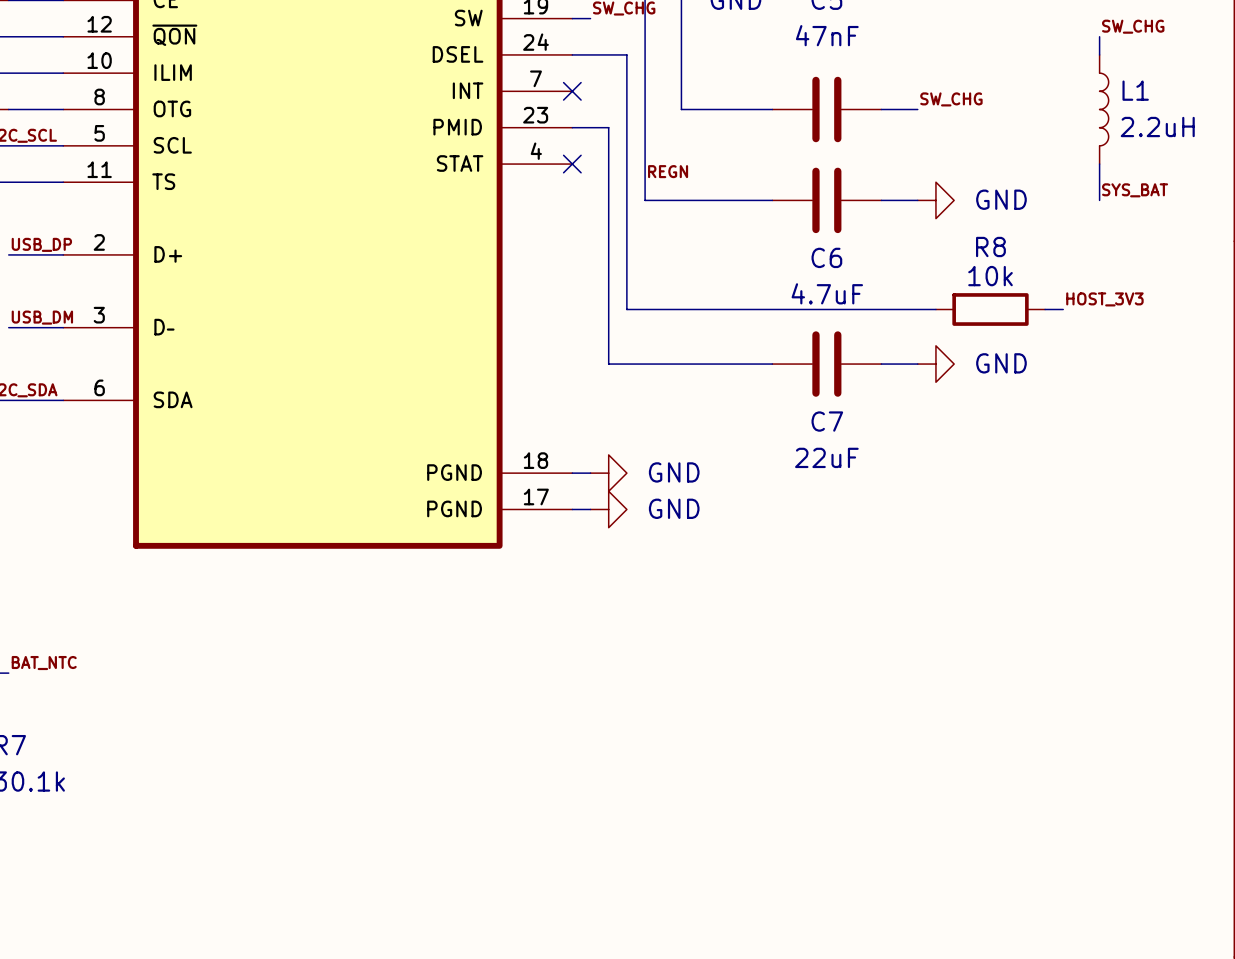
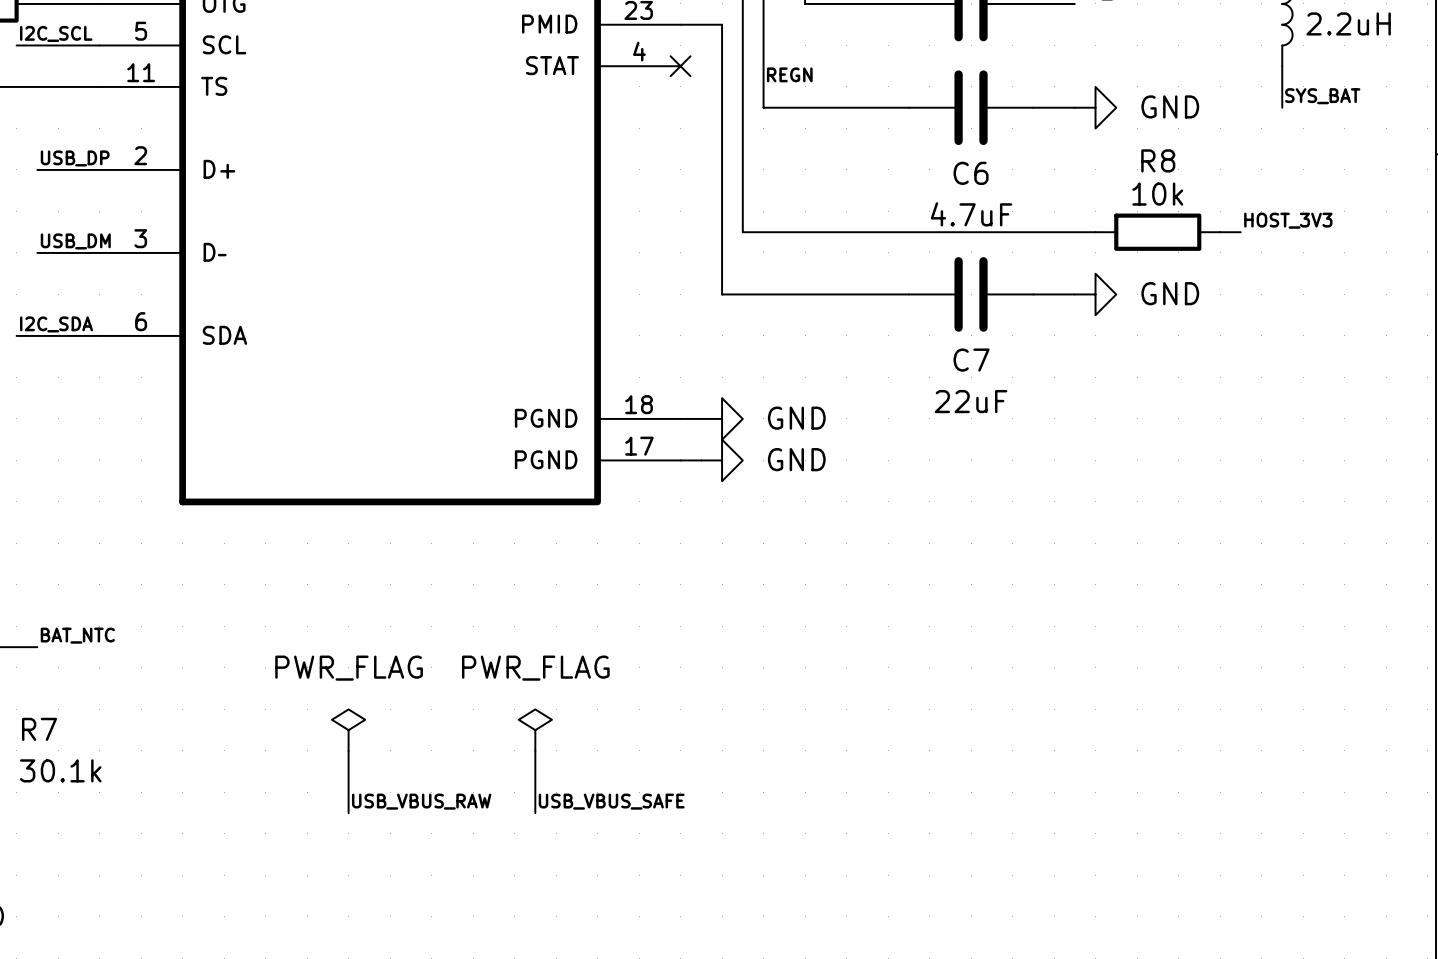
power symbol: none -> PWR_FLAG (348, 730)
power symbol: none -> PWR_FLAG (535, 730)
wire: none -> (348, 750) (348, 813)
wire: none -> (535, 750) (535, 813)
label: none -> USB_VBUS_RAW (421, 801)
label: none -> USB_VBUS_SAFE (611, 801)

